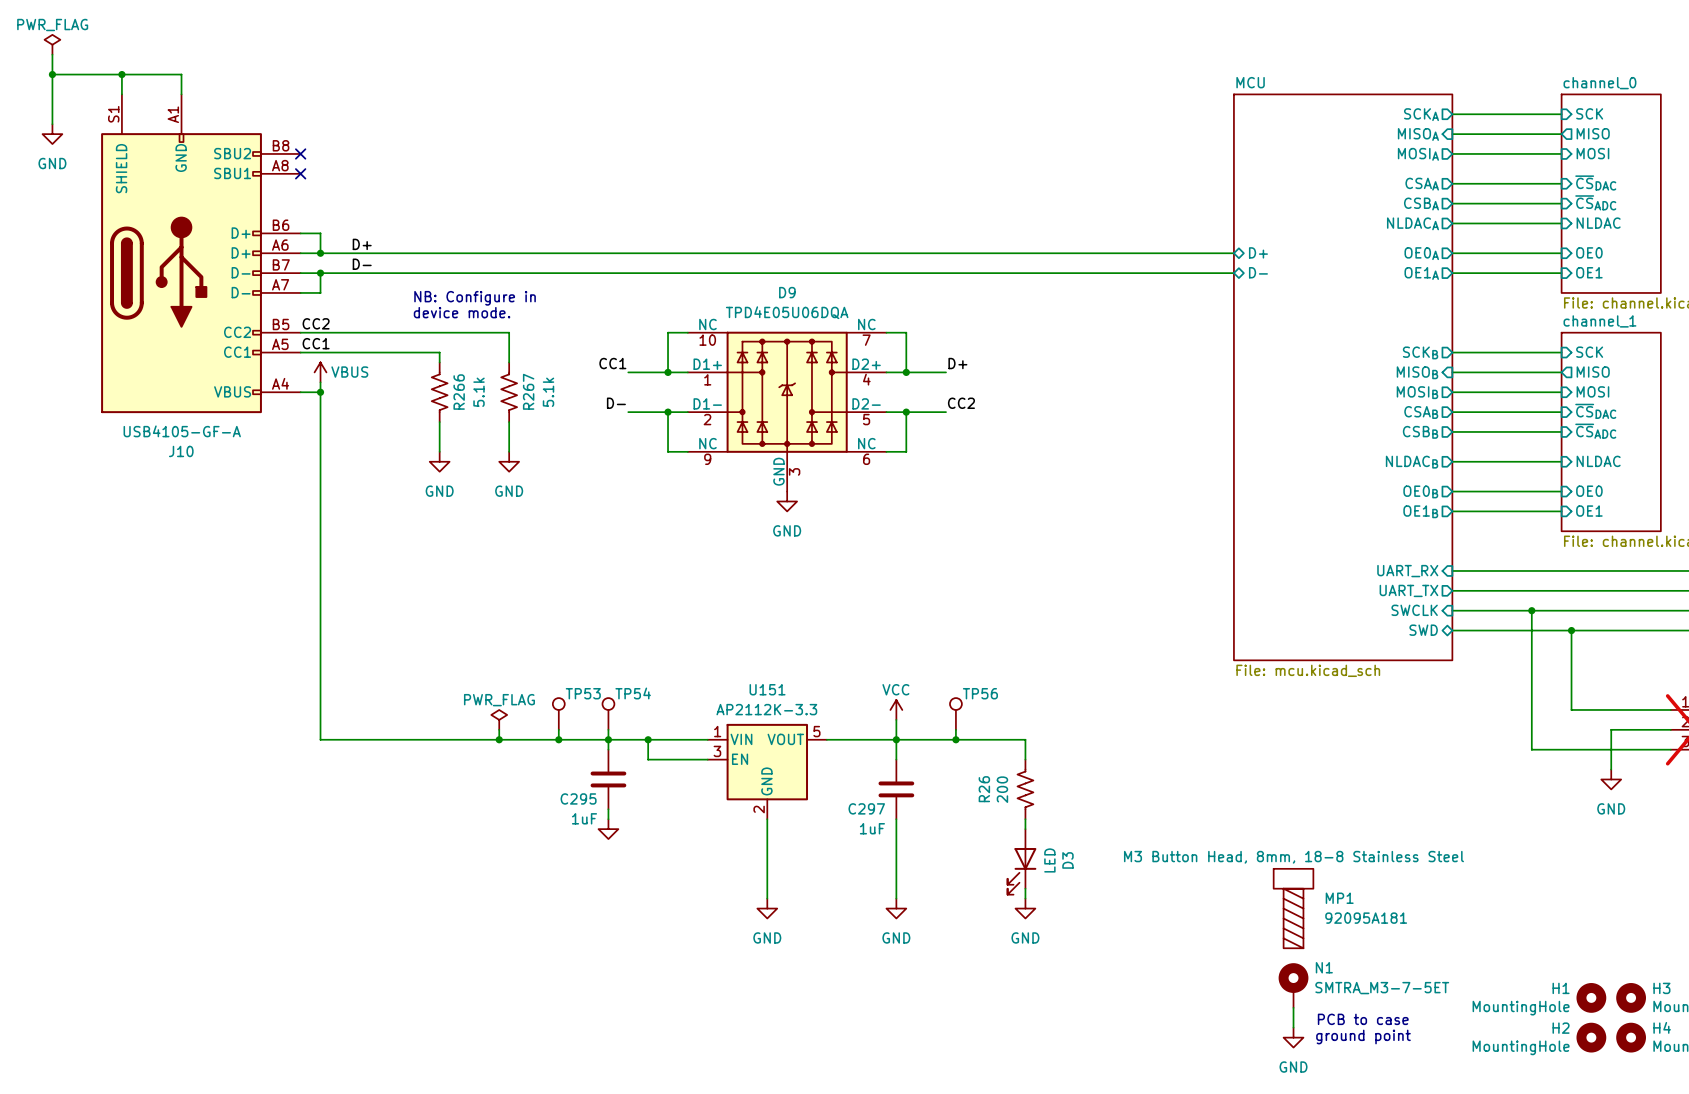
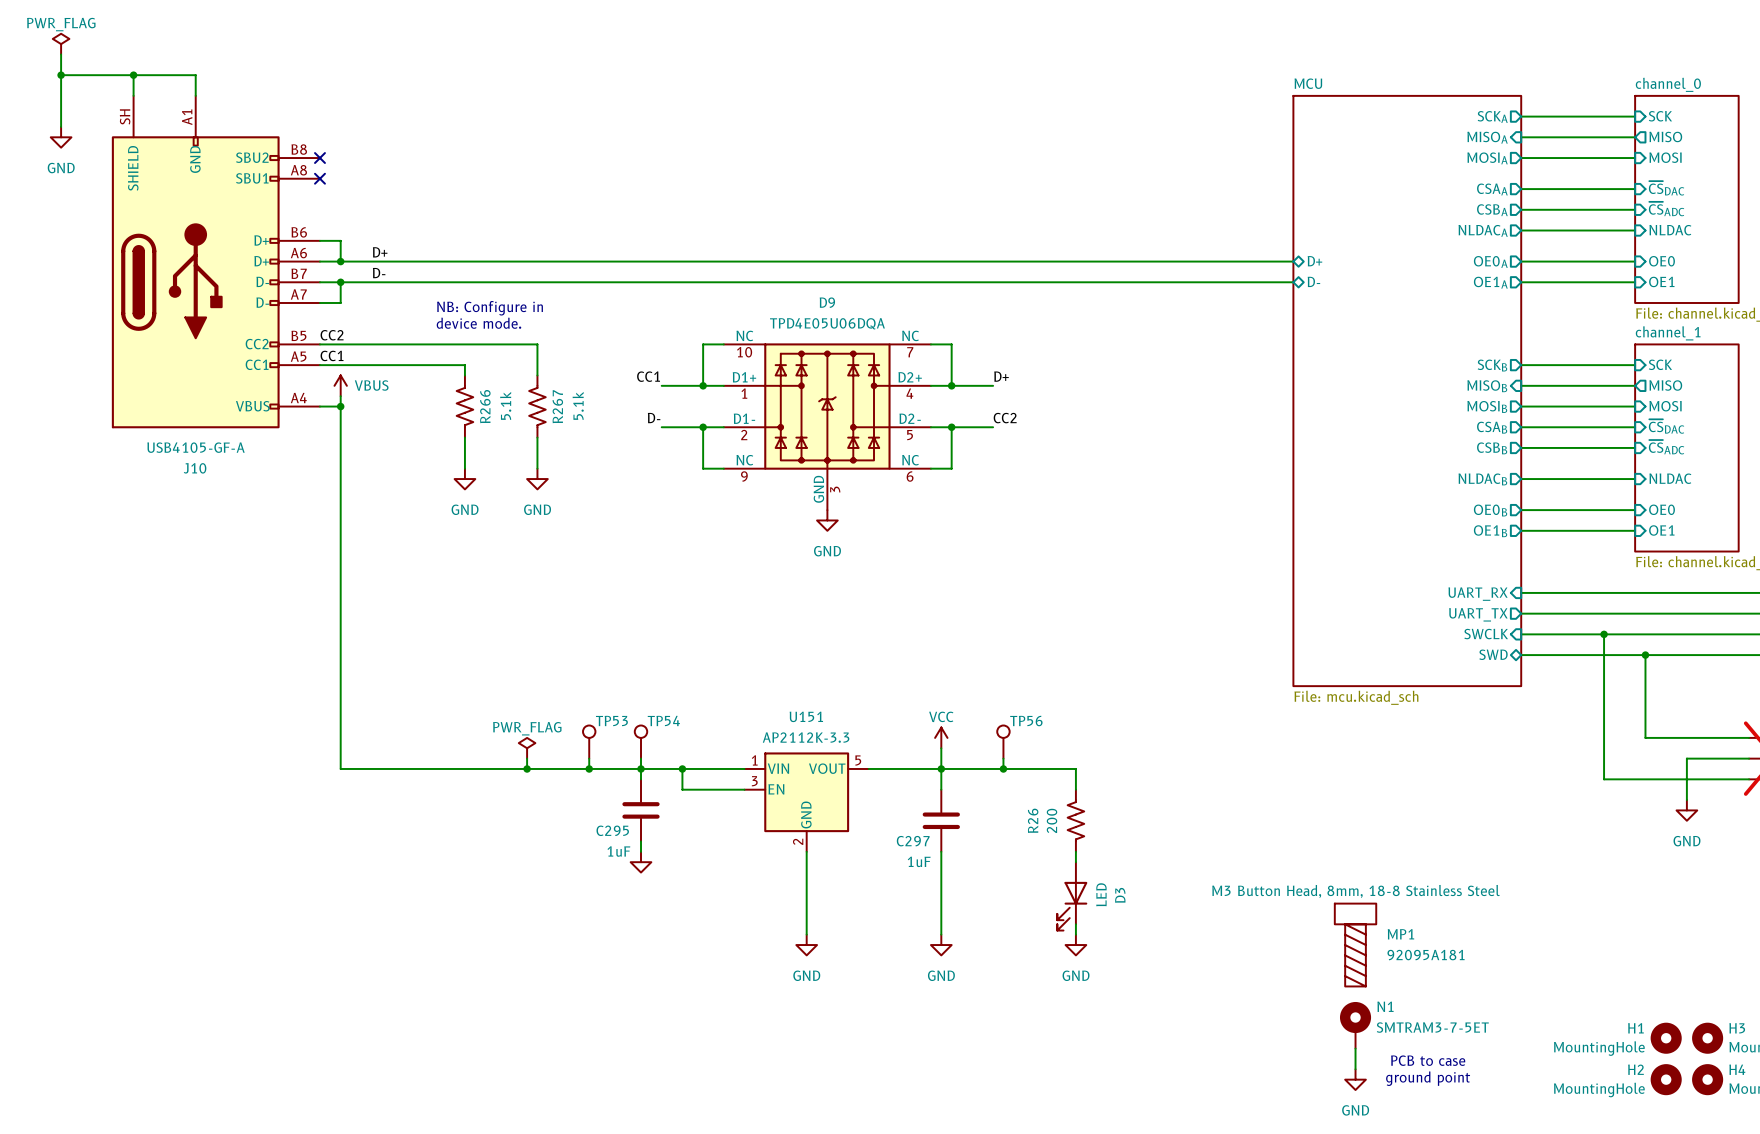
J10 pin number: S1 (113, 114) -> SH (125, 116)
N1 value: SMTRA_M3-7-5ET (1382, 988) -> SMTRAM3-7-5ET (1432, 1027)

